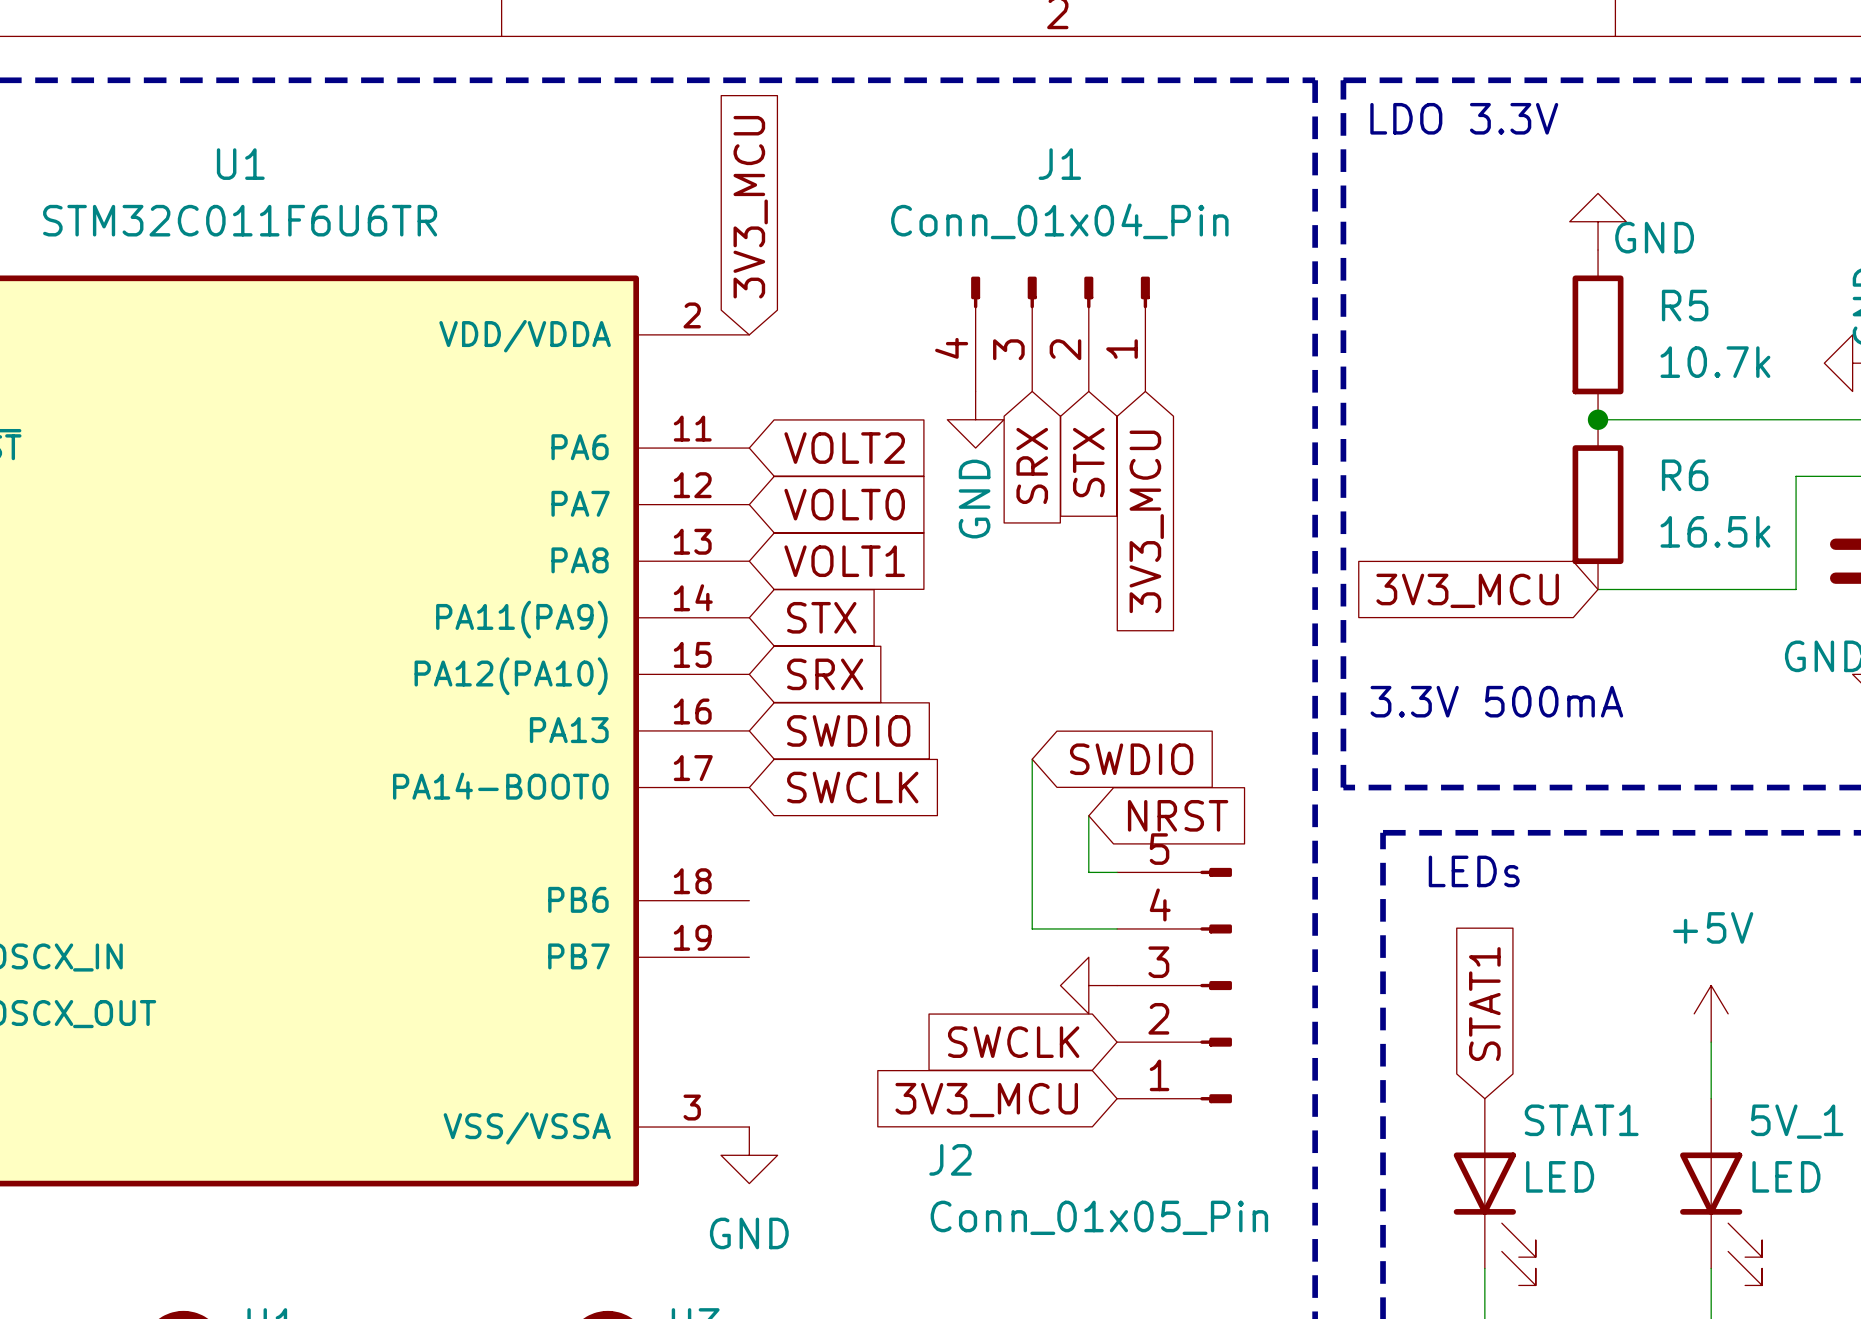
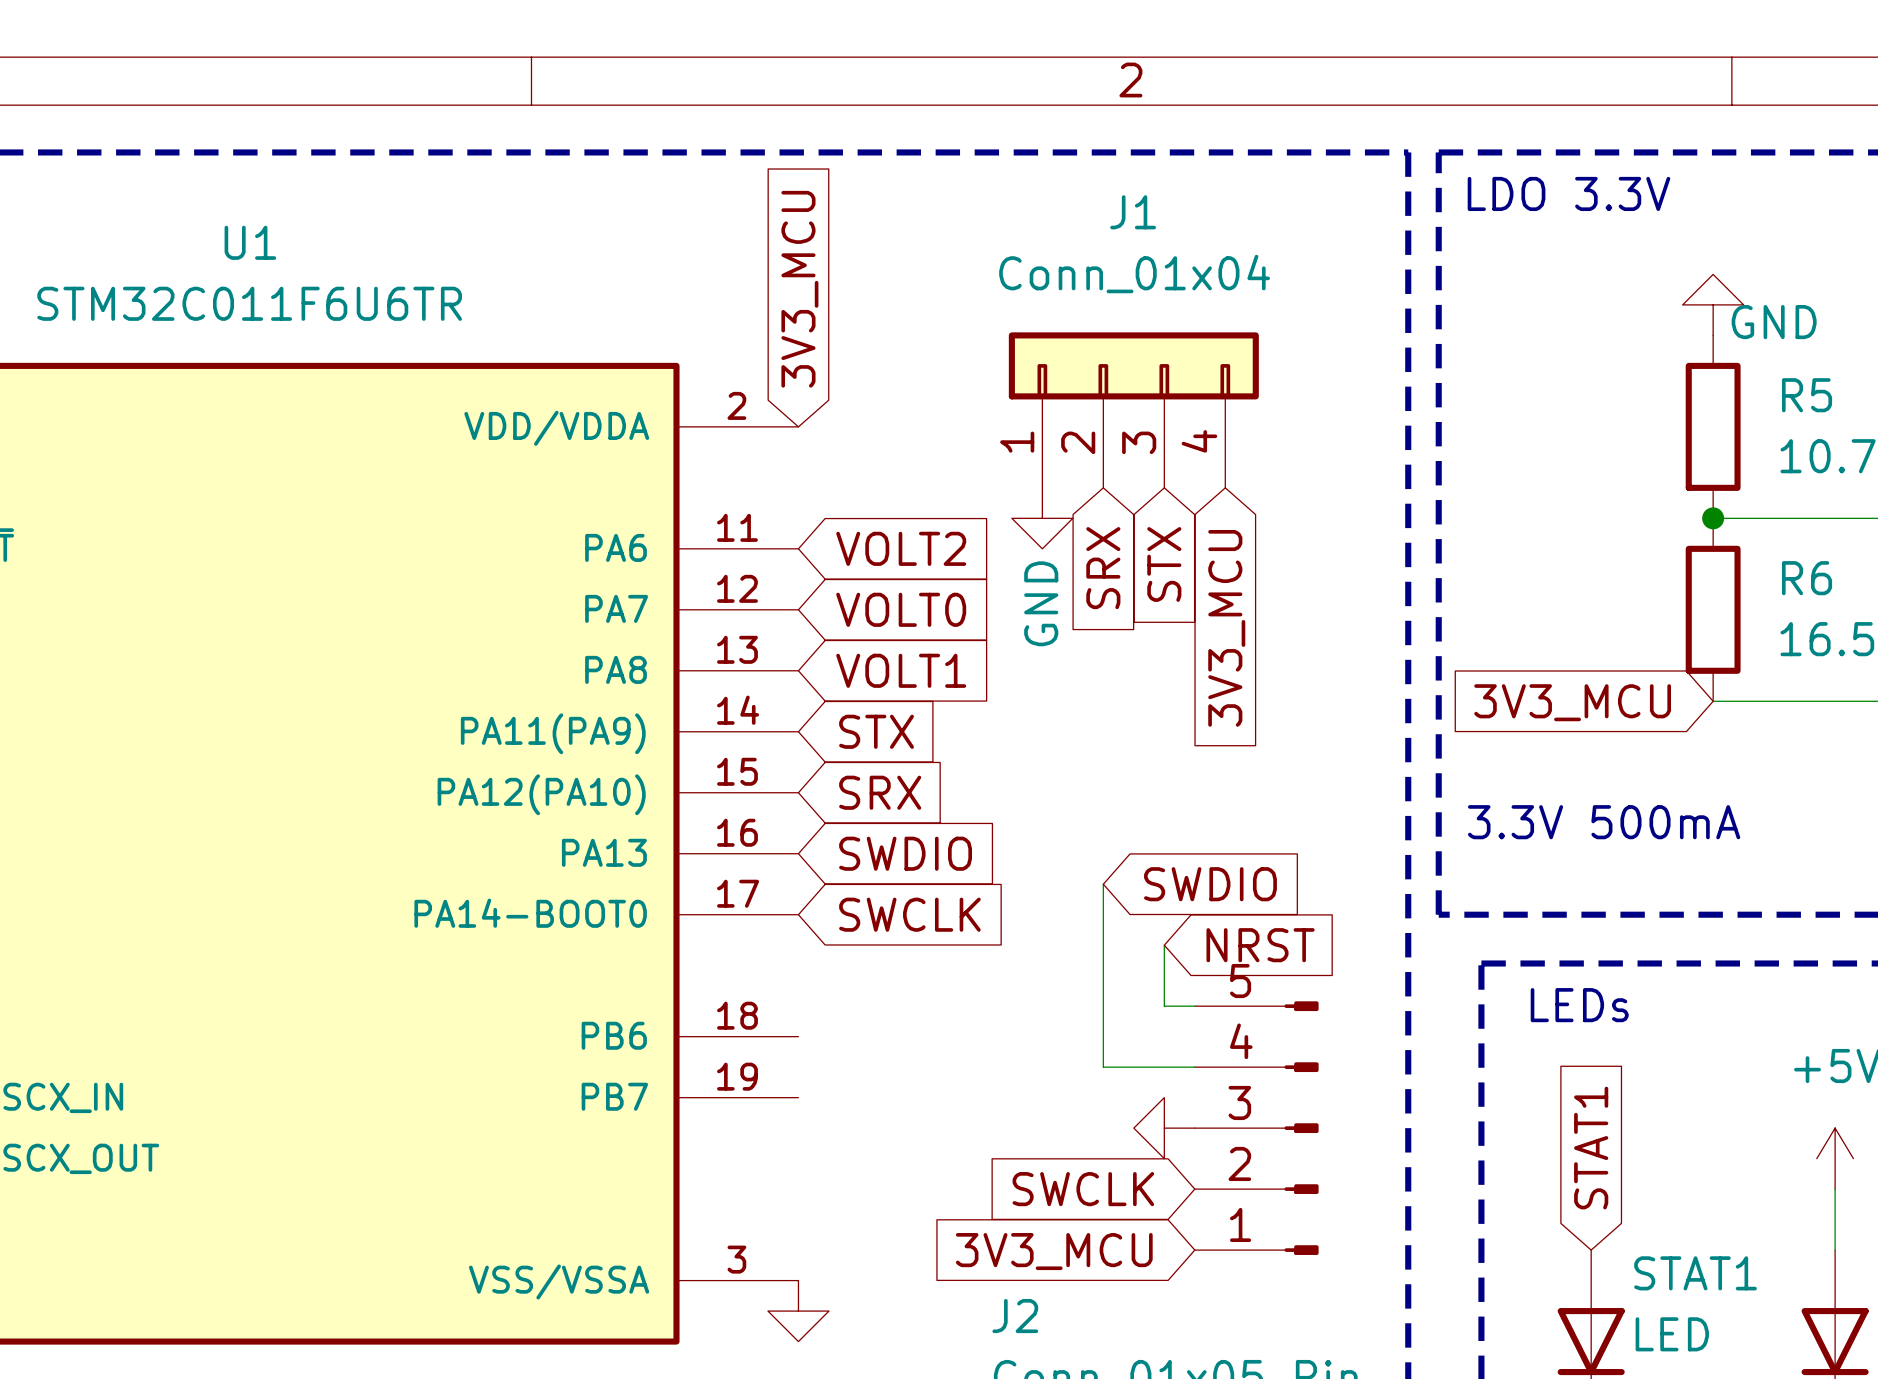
J1 value: Conn_01x04_Pin (1059, 221) -> Conn_01x04 (1134, 274)
J1 symbol: [971, 276, 1150, 392] -> [1008, 332, 1259, 488]

